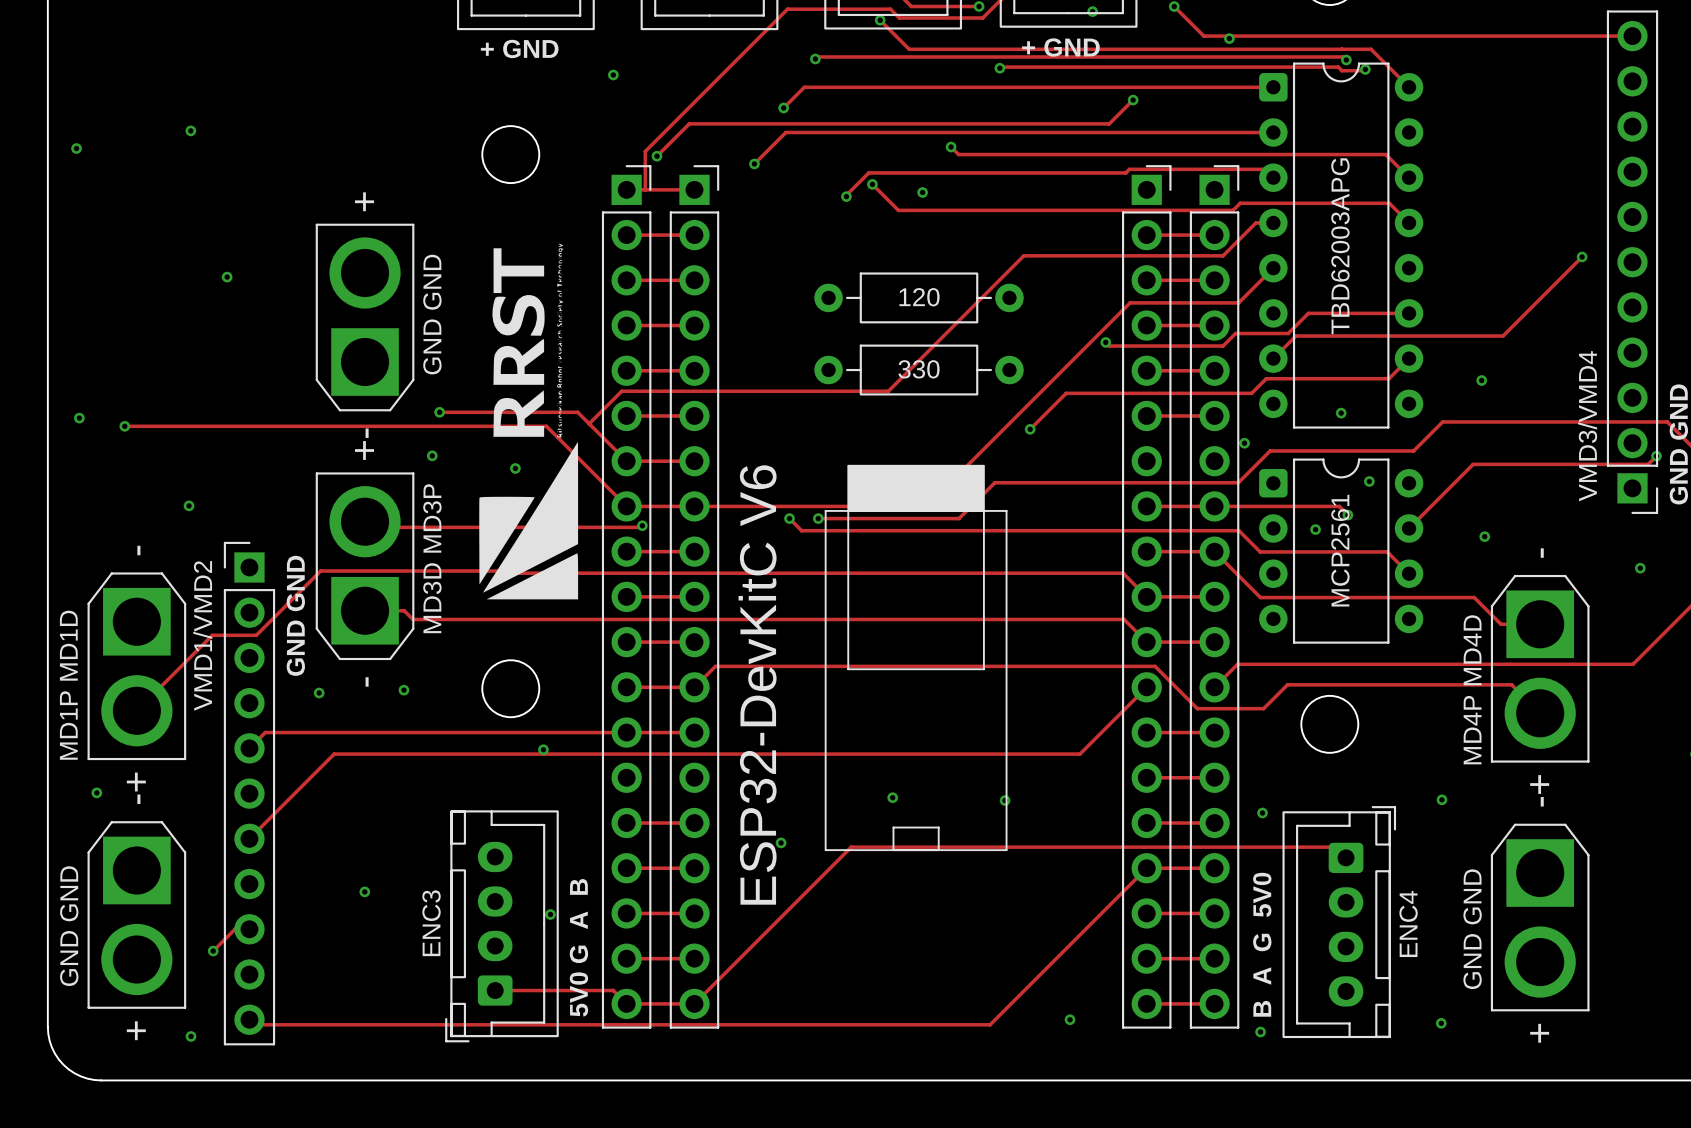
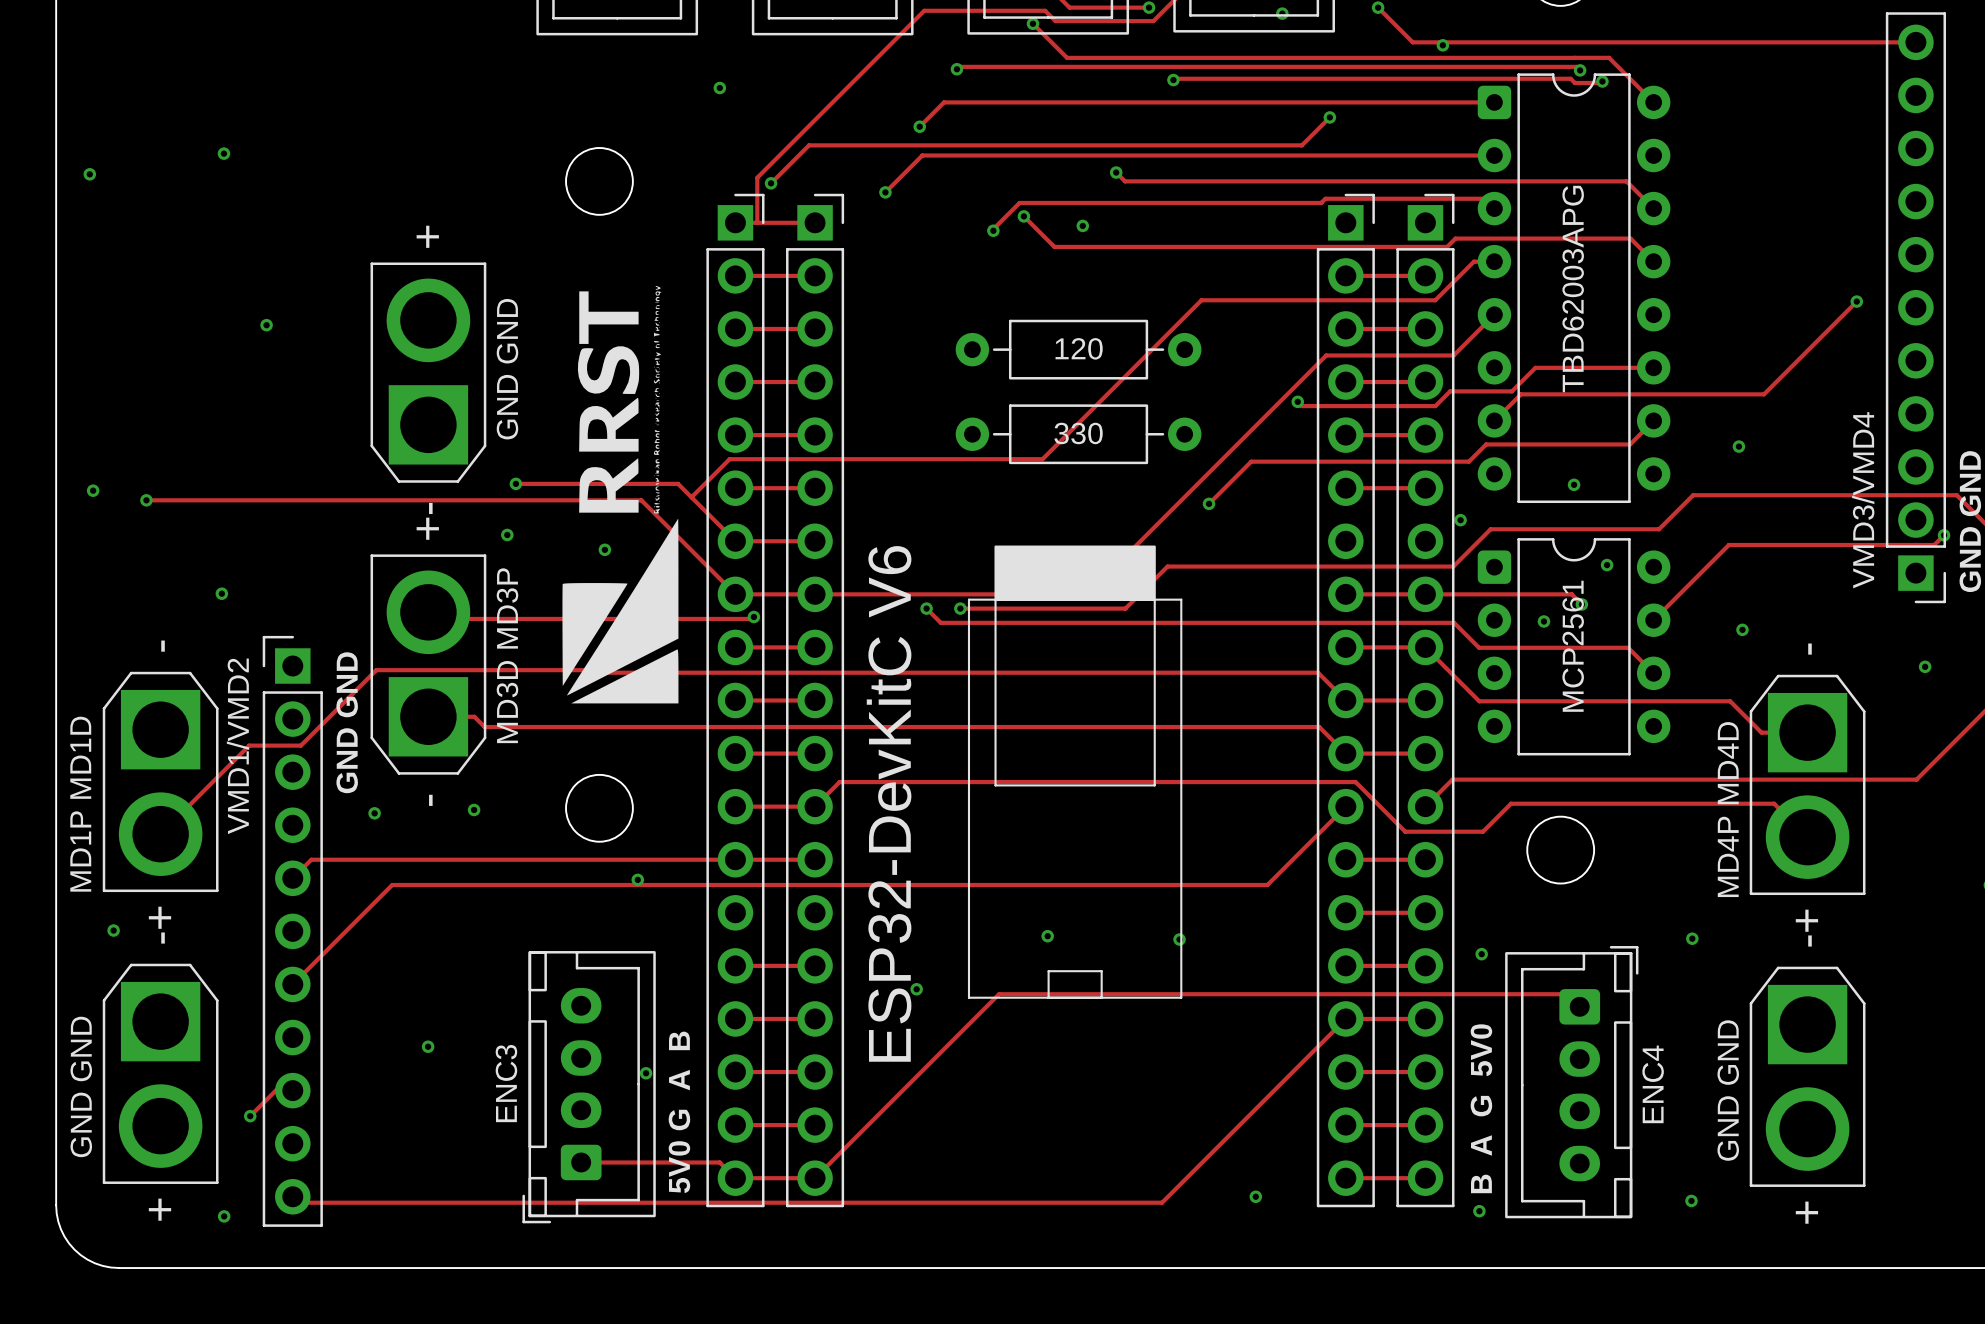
text: + GND (1060, 47) -> none
text: + GND (519, 48) -> none

